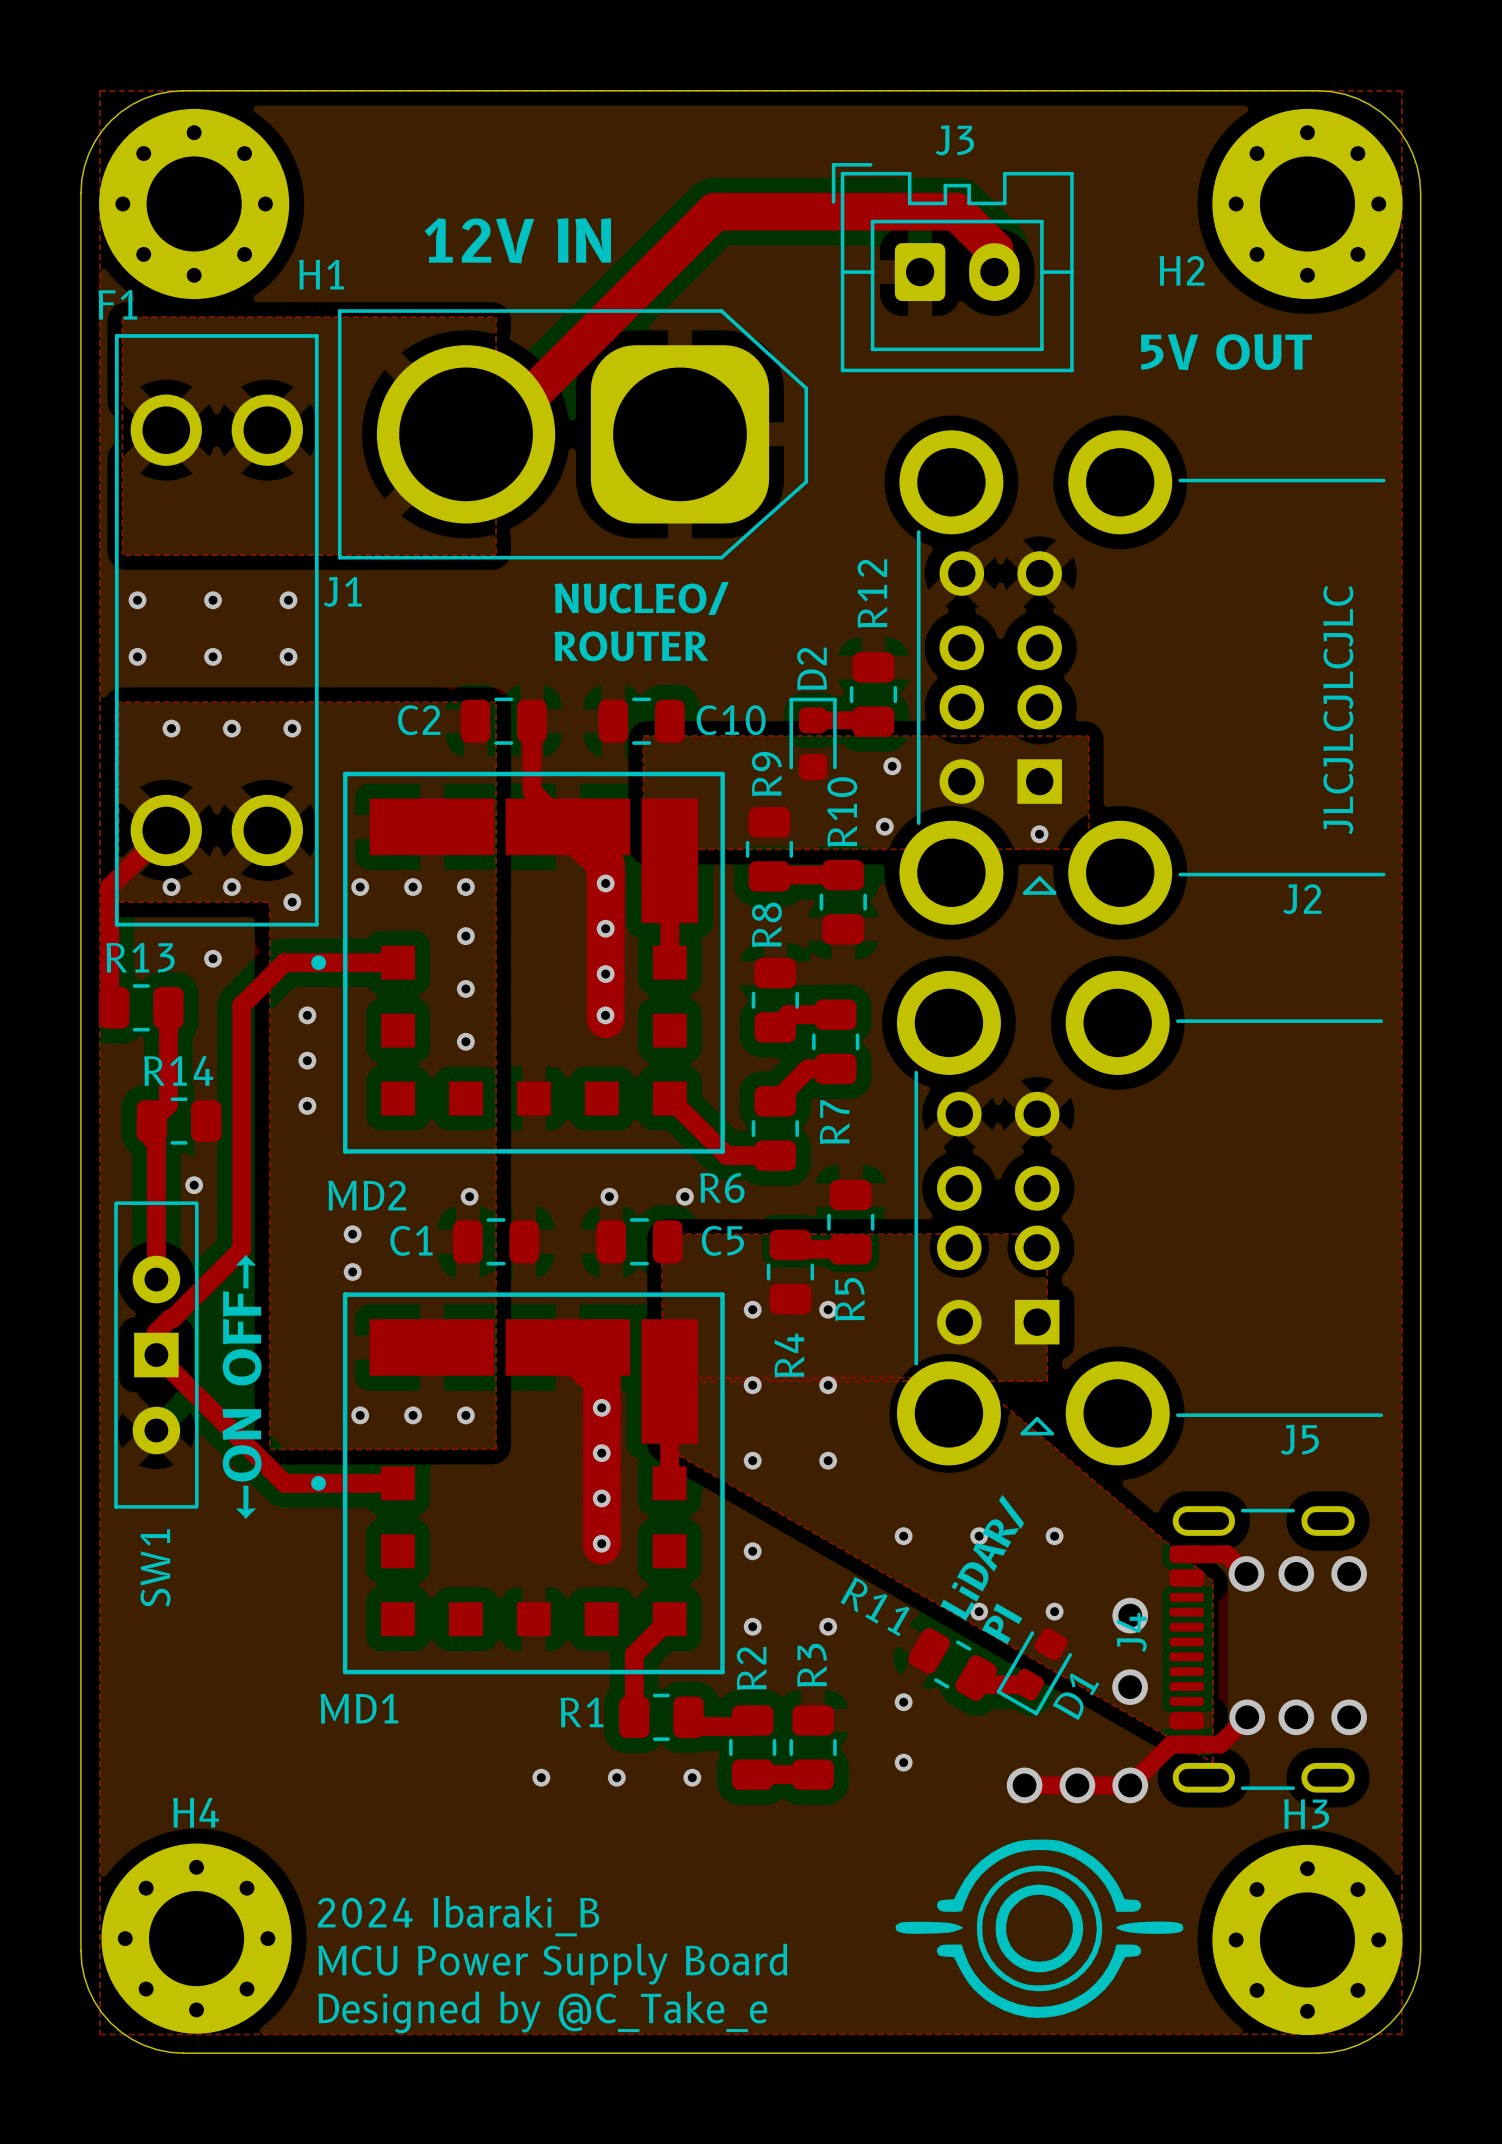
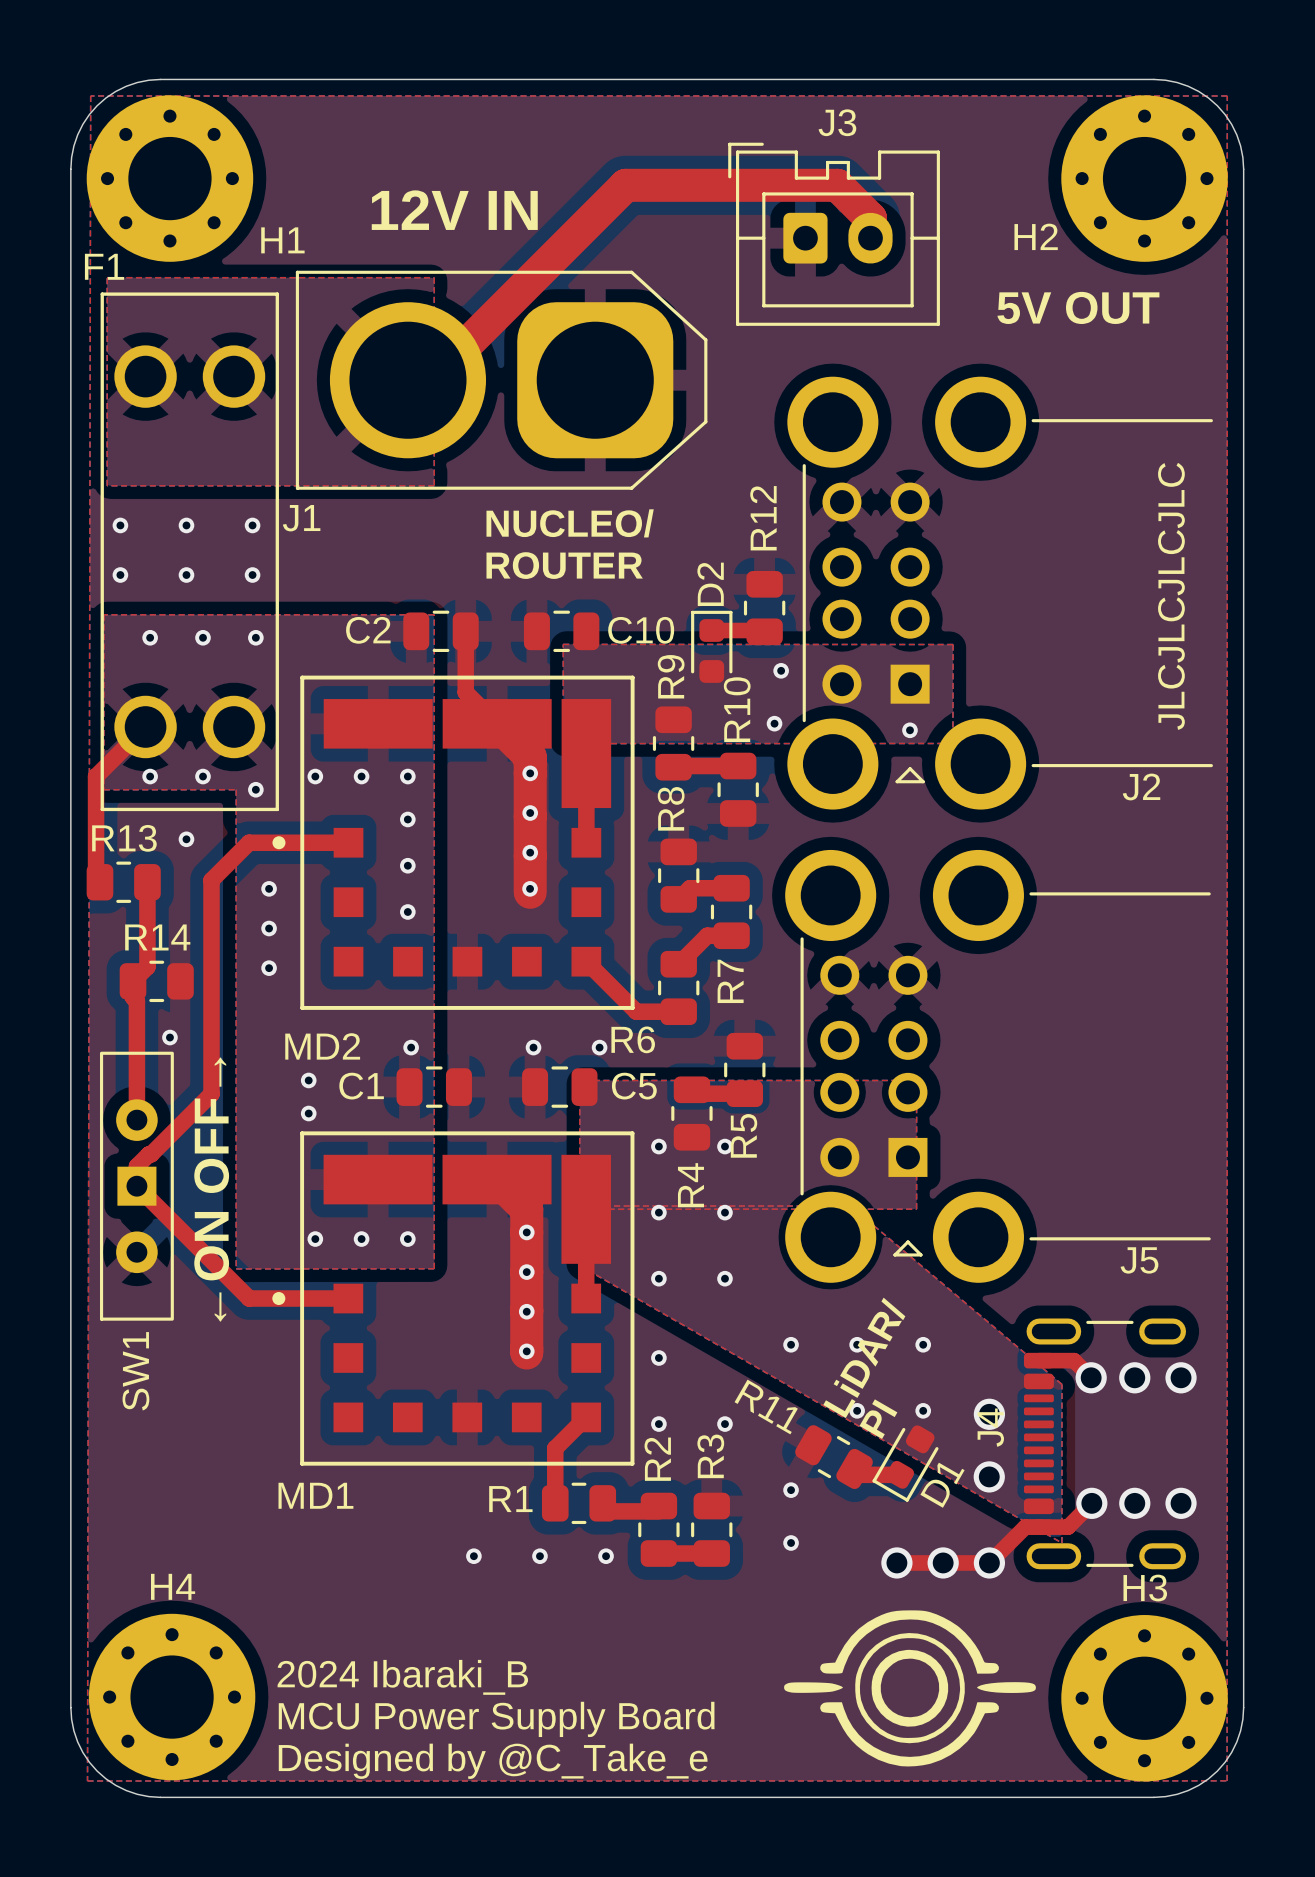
top zone outline: (1401, 2034) (1401, 90) (99, 90) (99, 2034) -> (1227, 1780) (1227, 95) (90, 95) (87, 1781)

